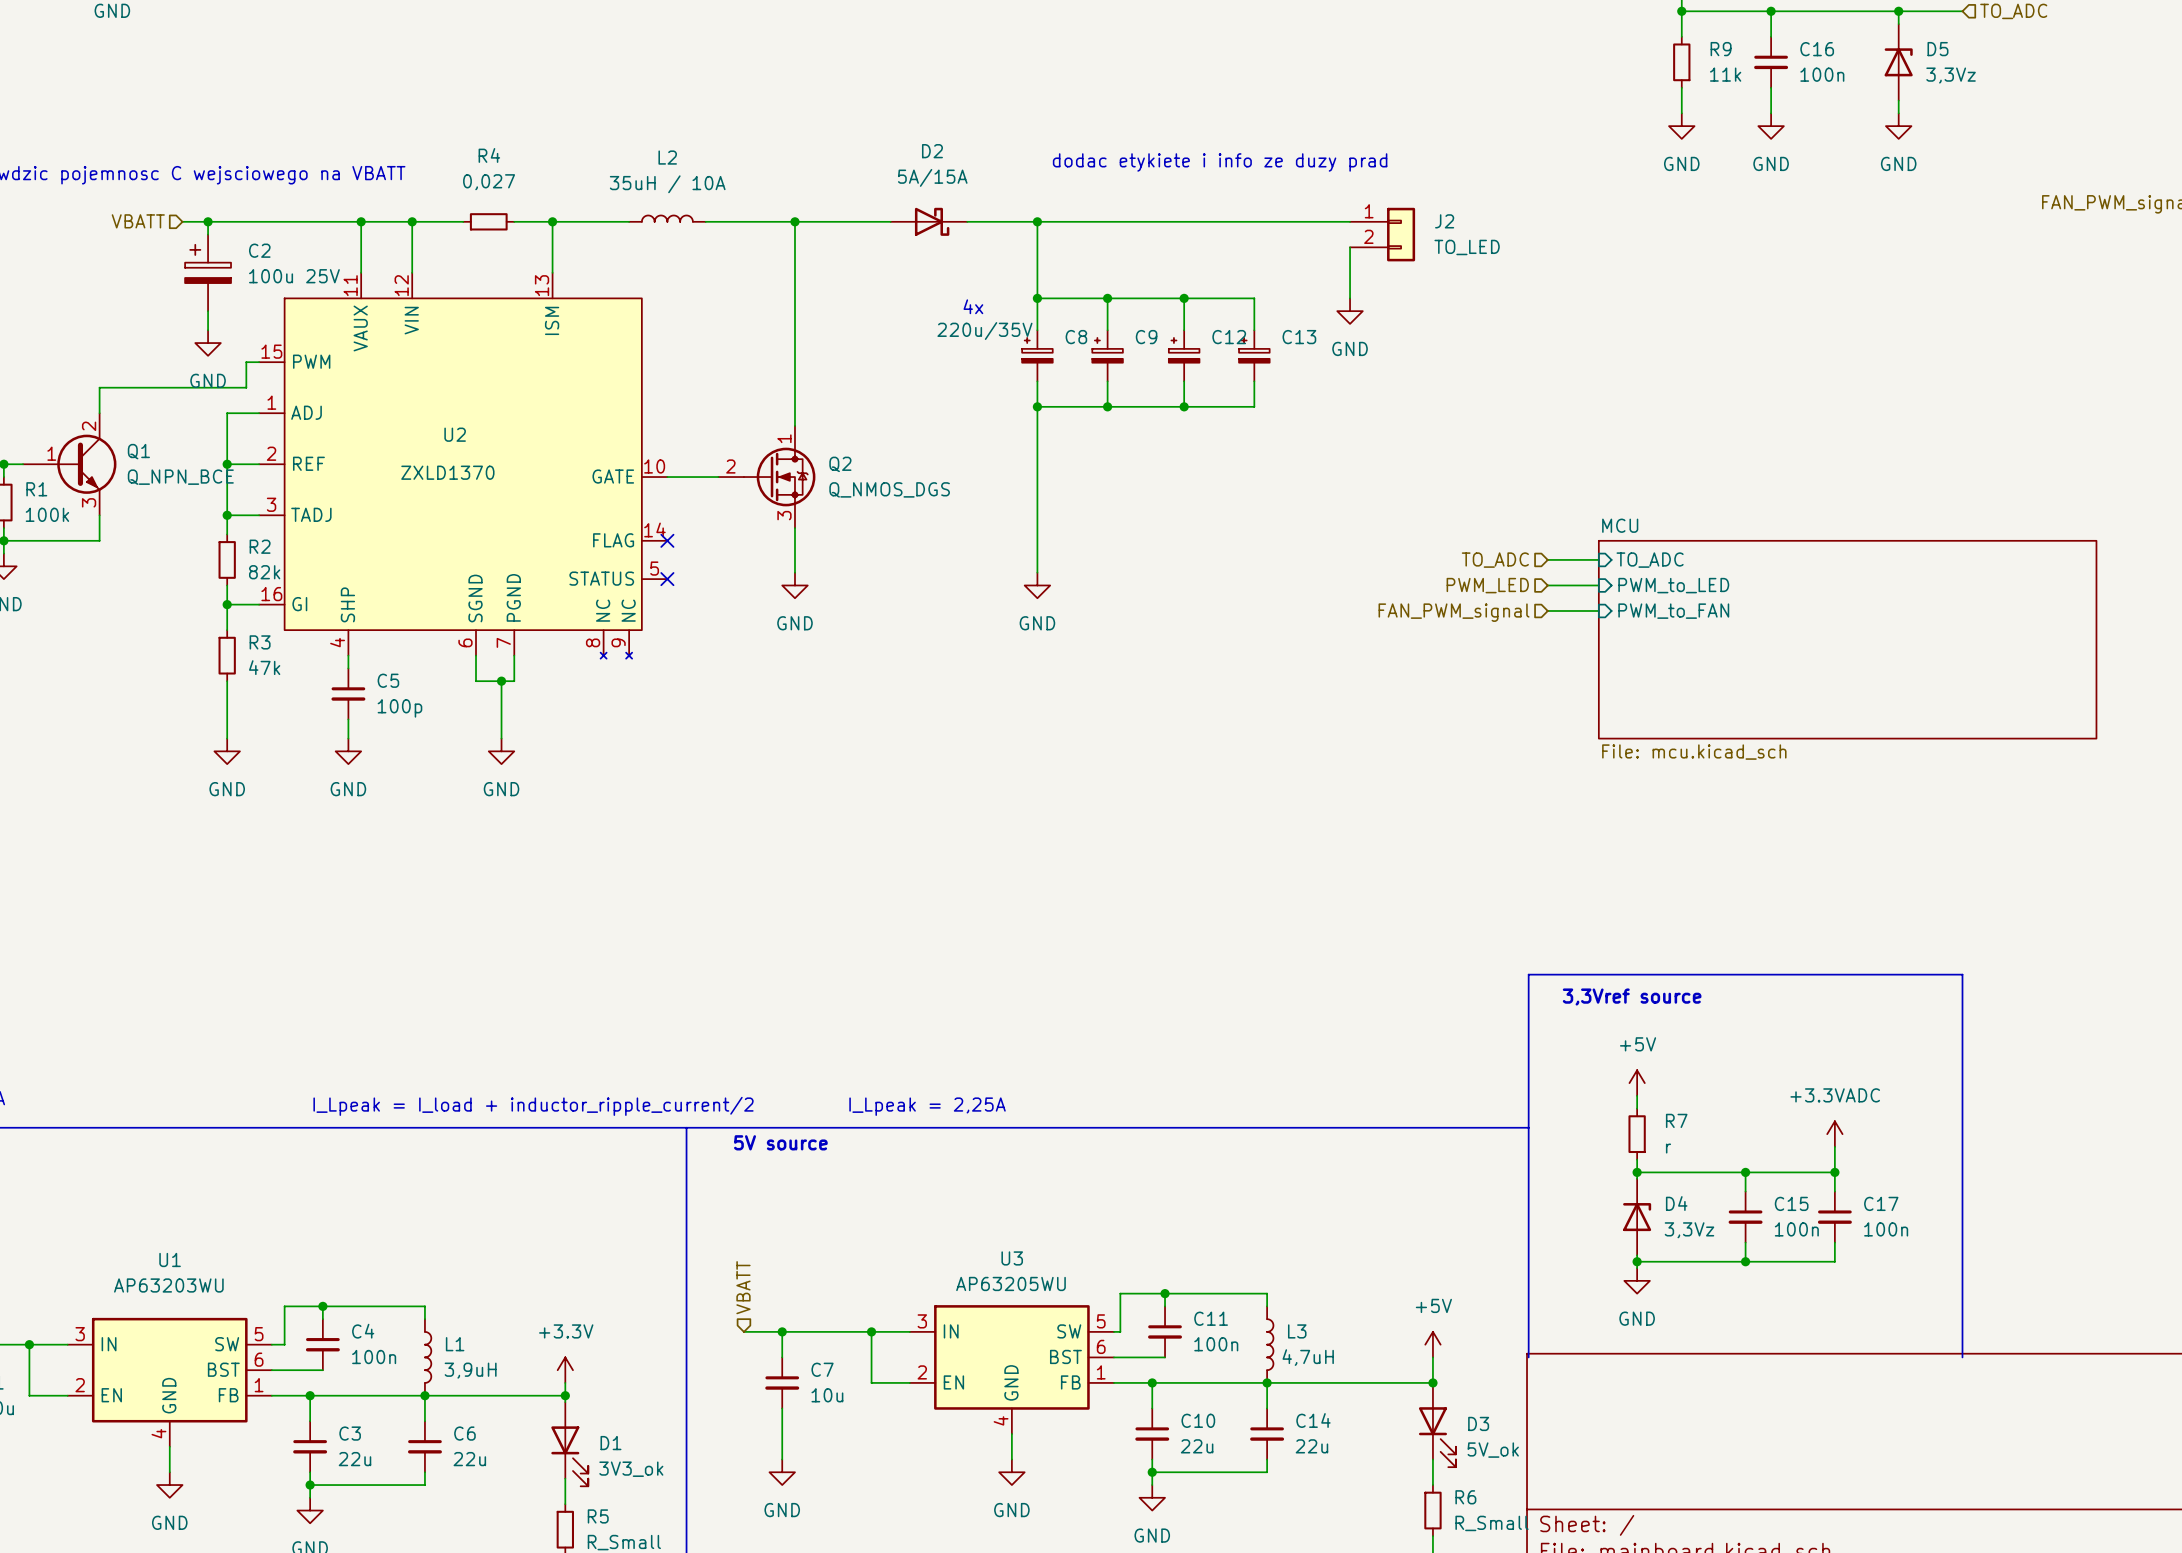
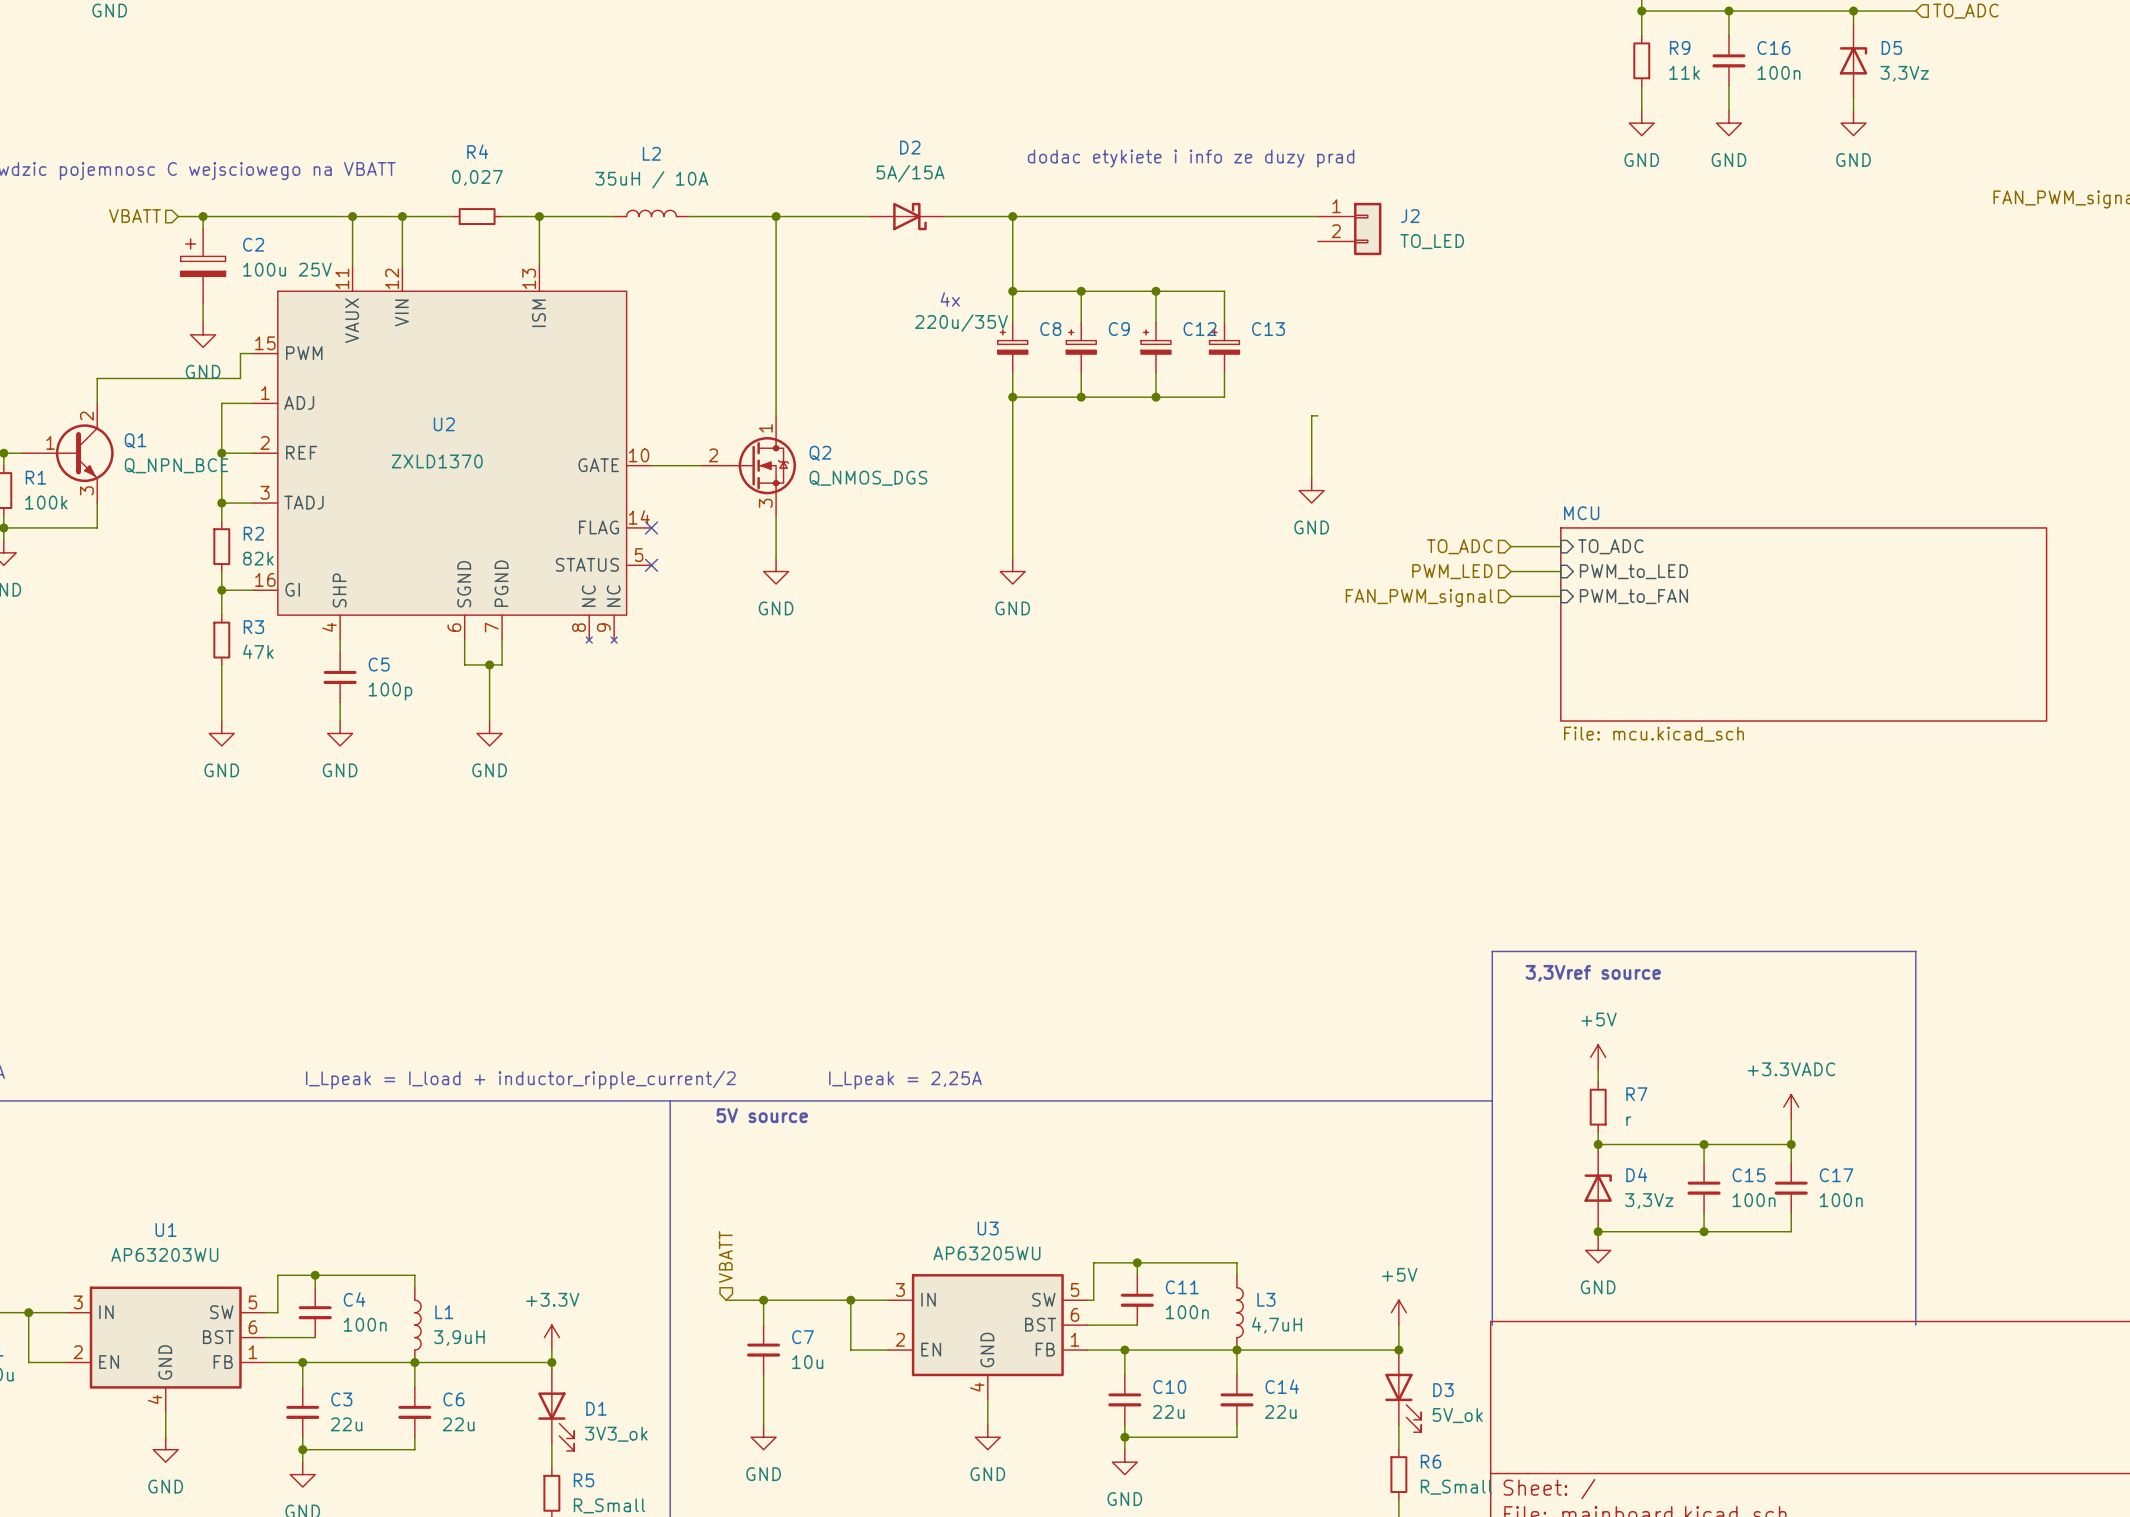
wire: (1350, 247) (1350, 298) -> none
power symbol position: GND (1350, 311) -> GND (1311, 490)
wire: none -> (1317, 415) (1311, 415) (1311, 478)

